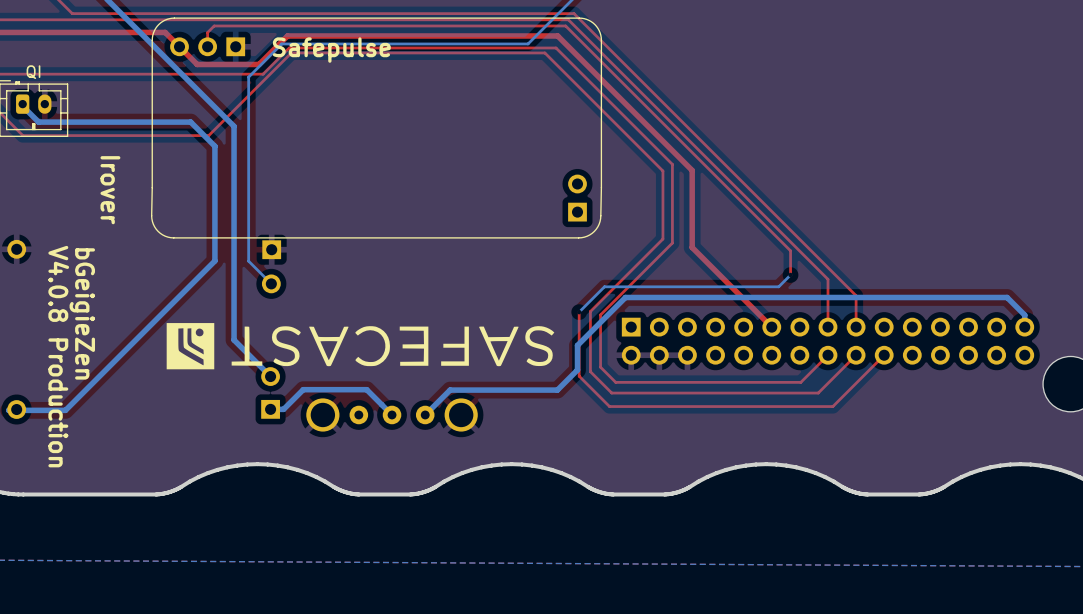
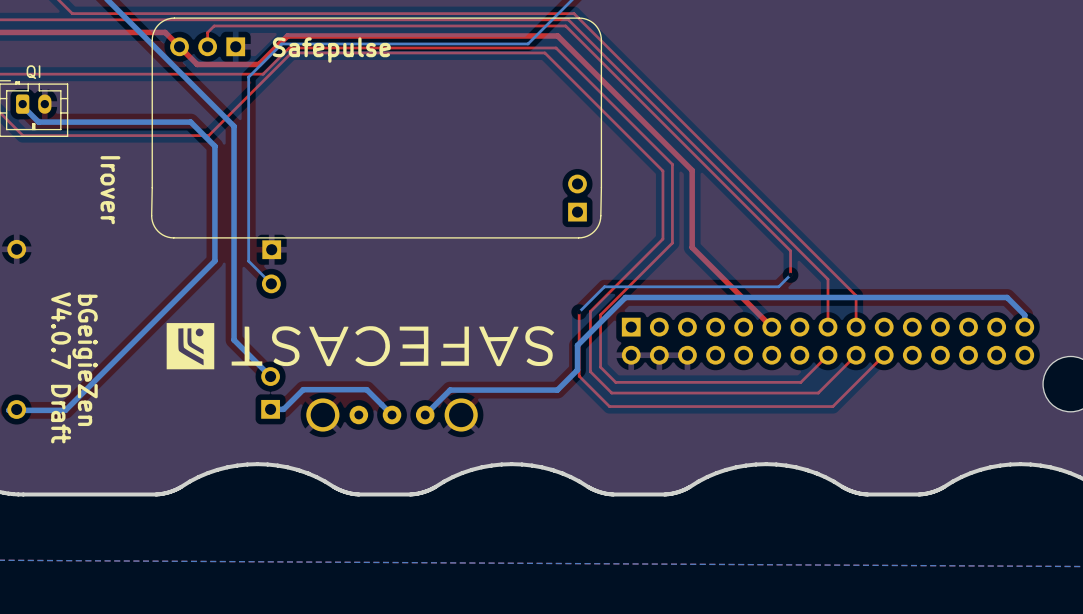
text position: bGeigieZen (82, 313) -> bGeigieZen (85, 360)
text: V4.0.8 Production (58, 356) -> none
text: none -> V4.0.7 Draft (61, 367)

